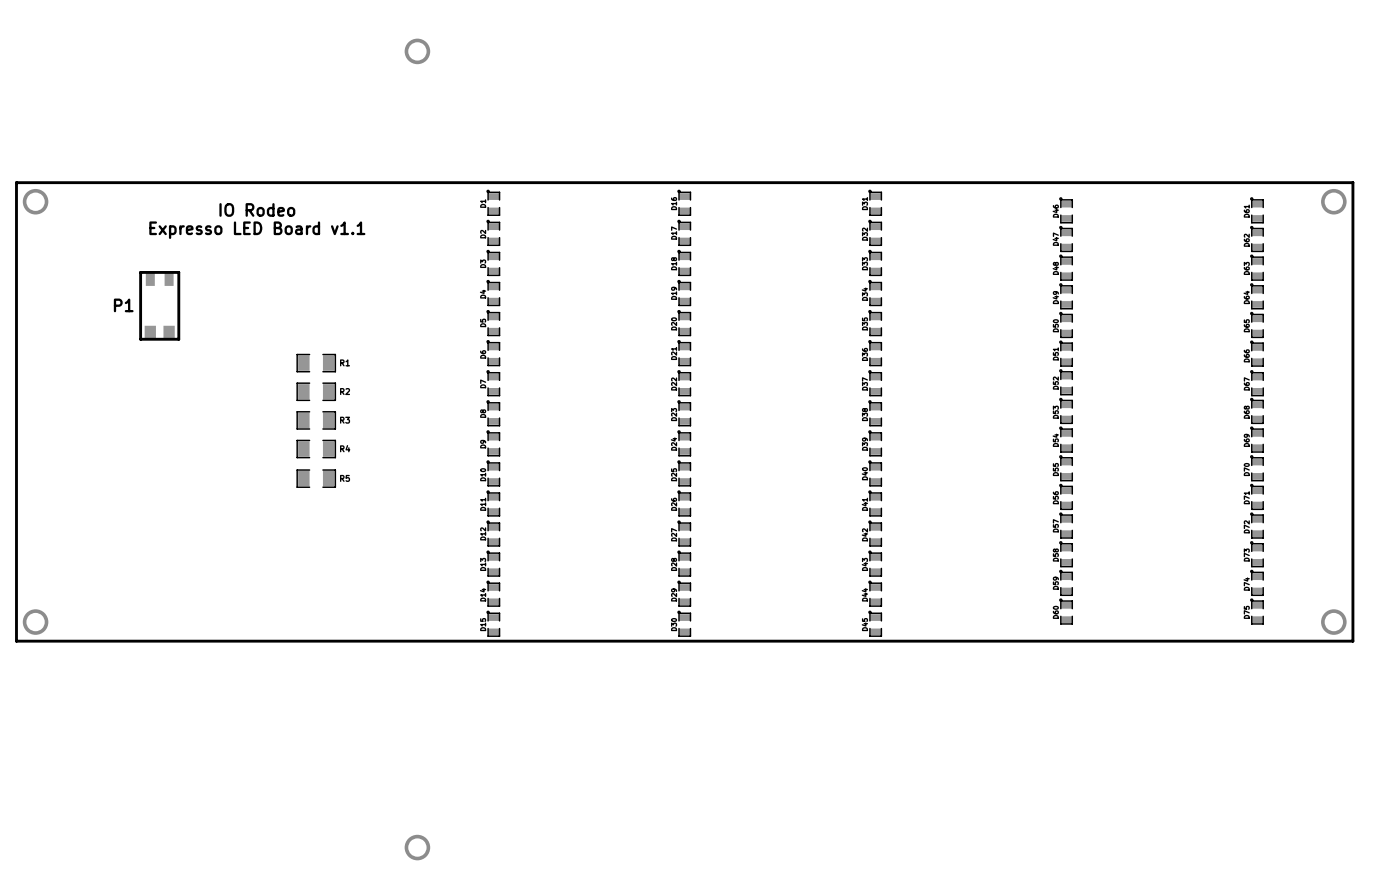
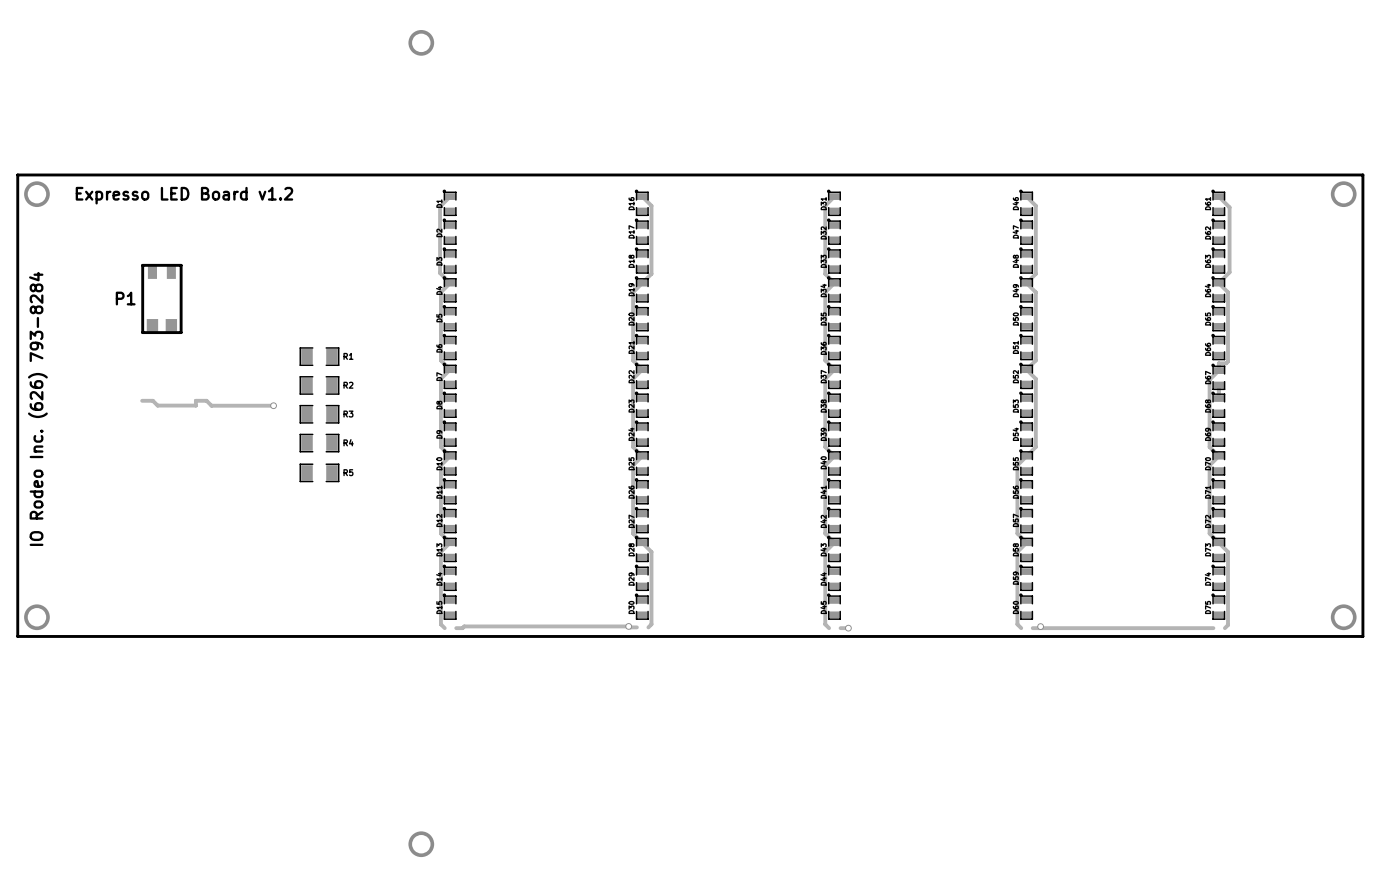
part position: (493, 202) -> (449, 202)
part position: (684, 202) -> (641, 202)
part position: (875, 202) -> (833, 202)
text: none -> Expresso LED Board v1.2 (184, 195)
track: none -> (450, 196) (440, 206) (440, 273) (450, 283) (440, 292) (440, 360) (450, 369) (440, 378) (440, 446) (450, 456) (440, 465) (440, 533) (450, 542) (440, 551) (440, 624) (444, 628)
track: none -> (642, 196) (651, 205) (651, 273) (633, 292) (633, 360) (642, 369) (633, 378) (633, 446) (642, 456) (633, 465) (633, 533) (651, 551) (651, 624) (648, 627)
track: none -> (834, 196) (825, 205) (825, 273) (834, 283) (825, 292) (825, 360) (834, 369) (825, 378) (825, 446) (834, 456) (825, 465) (825, 533) (834, 542) (825, 551) (825, 624) (829, 628)
track: none -> (1026, 196) (1035, 205) (1035, 273) (1026, 283) (1035, 292) (1035, 360) (1026, 369) (1035, 378) (1035, 446) (1017, 465) (1017, 533) (1026, 542) (1017, 551) (1017, 624) (1021, 628)
track: none -> (1218, 196) (1229, 207) (1229, 272) (1218, 283) (1228, 292) (1228, 361) (1218, 363) (1218, 370) (1209, 379) (1209, 446) (1218, 456) (1209, 465) (1209, 533) (1228, 551) (1228, 625) (1224, 628)
text: IO Rodeo (257, 209) -> none
part position: (1066, 210) -> (1026, 202)
part position: (1256, 210) -> (1218, 202)
text: Expresso LED Board v1.1 (257, 230) -> none
part position: (493, 232) -> (449, 231)
part position: (684, 232) -> (641, 231)
part position: (875, 232) -> (833, 231)
part position: (1066, 239) -> (1026, 231)
part position: (1256, 239) -> (1218, 231)
part position: (493, 262) -> (449, 260)
part position: (684, 262) -> (641, 260)
part position: (875, 262) -> (833, 260)
part position: (1066, 267) -> (1026, 260)
part position: (1256, 267) -> (1218, 260)
part position: (493, 293) -> (449, 289)
part position: (684, 293) -> (641, 289)
part position: (875, 293) -> (833, 289)
part position: (1066, 296) -> (1026, 289)
part position: (1256, 296) -> (1218, 289)
part position: (493, 323) -> (449, 318)
part position: (684, 323) -> (641, 318)
part position: (875, 323) -> (833, 318)
part position: (1066, 324) -> (1026, 318)
part position: (1256, 324) -> (1218, 318)
part position: (493, 353) -> (449, 347)
part position: (684, 353) -> (641, 347)
part position: (875, 353) -> (833, 347)
part position: (1066, 353) -> (1026, 347)
part position: (1256, 353) -> (1218, 347)
part position: (1066, 382) -> (1026, 375)
part position: (493, 383) -> (449, 375)
part position: (684, 383) -> (641, 375)
part position: (875, 383) -> (833, 375)
part position: (1257, 383) -> (1218, 376)
track: none -> (142, 400) (152, 400) (157, 405) (195, 405) (195, 400) (206, 400) (211, 405) (273, 405)
part position: (1066, 410) -> (1026, 404)
part position: (1256, 410) -> (1218, 404)
via: none -> (273, 405)
part position: (493, 413) -> (449, 404)
part position: (684, 413) -> (641, 404)
part position: (875, 413) -> (833, 404)
text: none -> IO Rodeo Inc. (626) 793-8284 (37, 408)
part position: (1066, 439) -> (1026, 433)
part position: (1256, 439) -> (1218, 433)
part position: (493, 443) -> (449, 433)
part position: (684, 443) -> (641, 433)
part position: (875, 443) -> (833, 433)
part position: (1066, 468) -> (1026, 462)
part position: (1256, 468) -> (1218, 462)
part position: (493, 473) -> (449, 462)
part position: (684, 473) -> (641, 462)
part position: (875, 473) -> (833, 462)
part position: (1066, 496) -> (1026, 491)
part position: (1256, 496) -> (1218, 491)
part position: (493, 503) -> (449, 491)
part position: (684, 503) -> (641, 491)
part position: (875, 503) -> (833, 491)
part position: (1066, 525) -> (1026, 520)
part position: (1256, 525) -> (1218, 520)
part position: (493, 533) -> (449, 520)
part position: (684, 533) -> (641, 520)
part position: (875, 533) -> (833, 520)
part position: (1066, 554) -> (1026, 548)
part position: (1256, 554) -> (1218, 548)
part position: (493, 563) -> (449, 548)
part position: (684, 563) -> (641, 548)
part position: (875, 563) -> (833, 548)
part position: (1066, 582) -> (1026, 577)
part position: (1256, 582) -> (1218, 577)
part position: (493, 593) -> (449, 577)
part position: (684, 593) -> (641, 577)
part position: (875, 593) -> (833, 577)
part position: (1066, 611) -> (1026, 606)
part position: (1256, 611) -> (1218, 606)
part position: (493, 623) -> (449, 606)
part position: (684, 623) -> (641, 606)
part position: (875, 623) -> (833, 606)
via: none -> (628, 626)
via: none -> (1040, 626)
track: none -> (636, 627) (464, 626) (456, 628)
track: none -> (840, 628) (848, 628)
via: none -> (848, 628)
track: none -> (1032, 628) (1213, 628)

